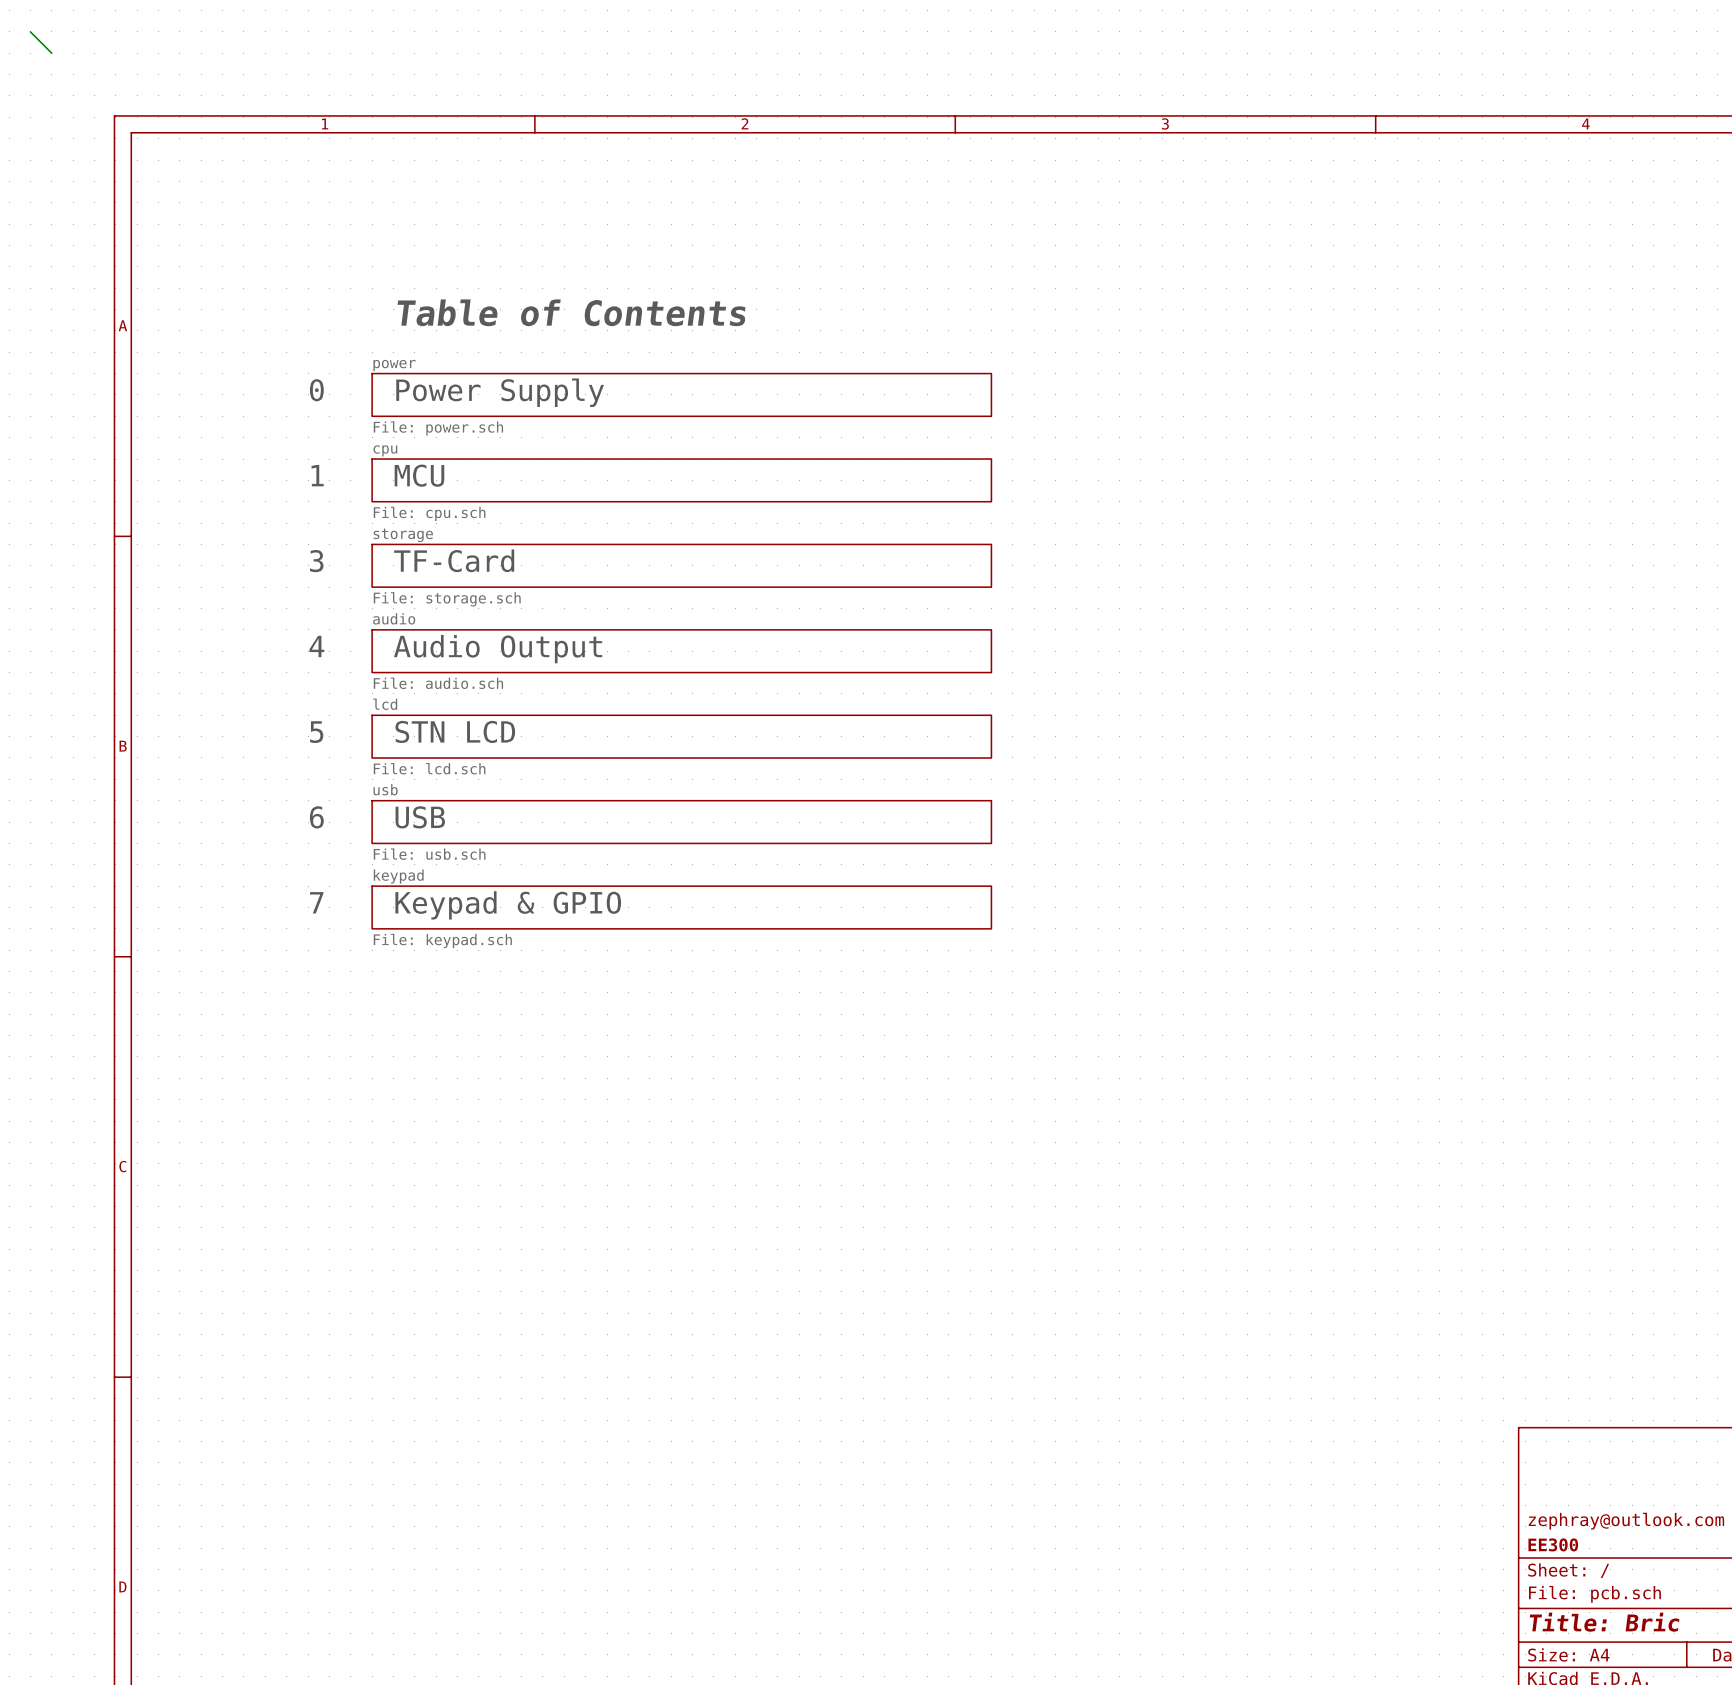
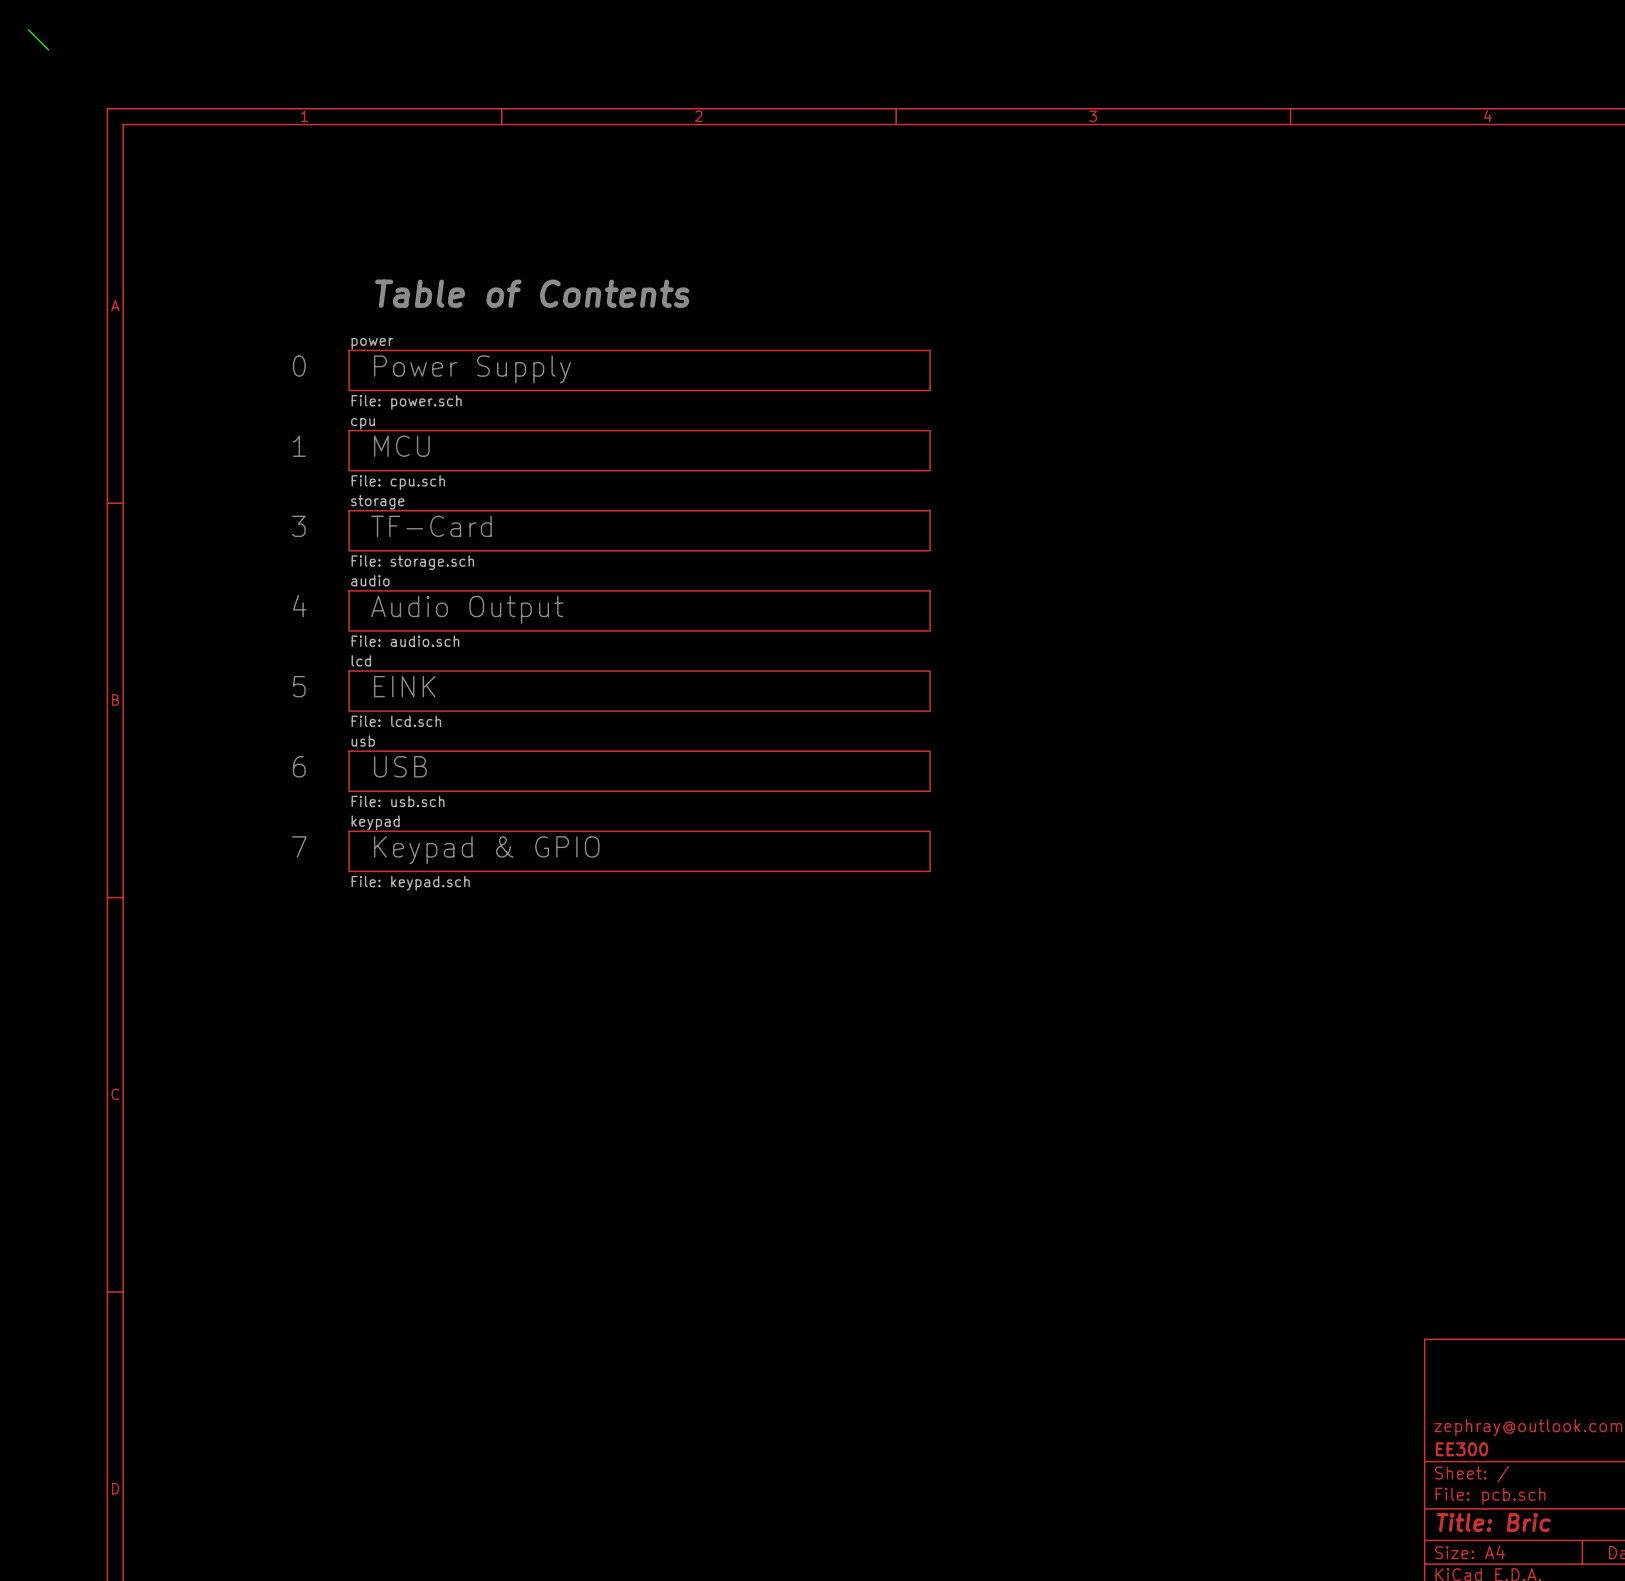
text: STN LCD (455, 731) -> EINK (404, 686)

